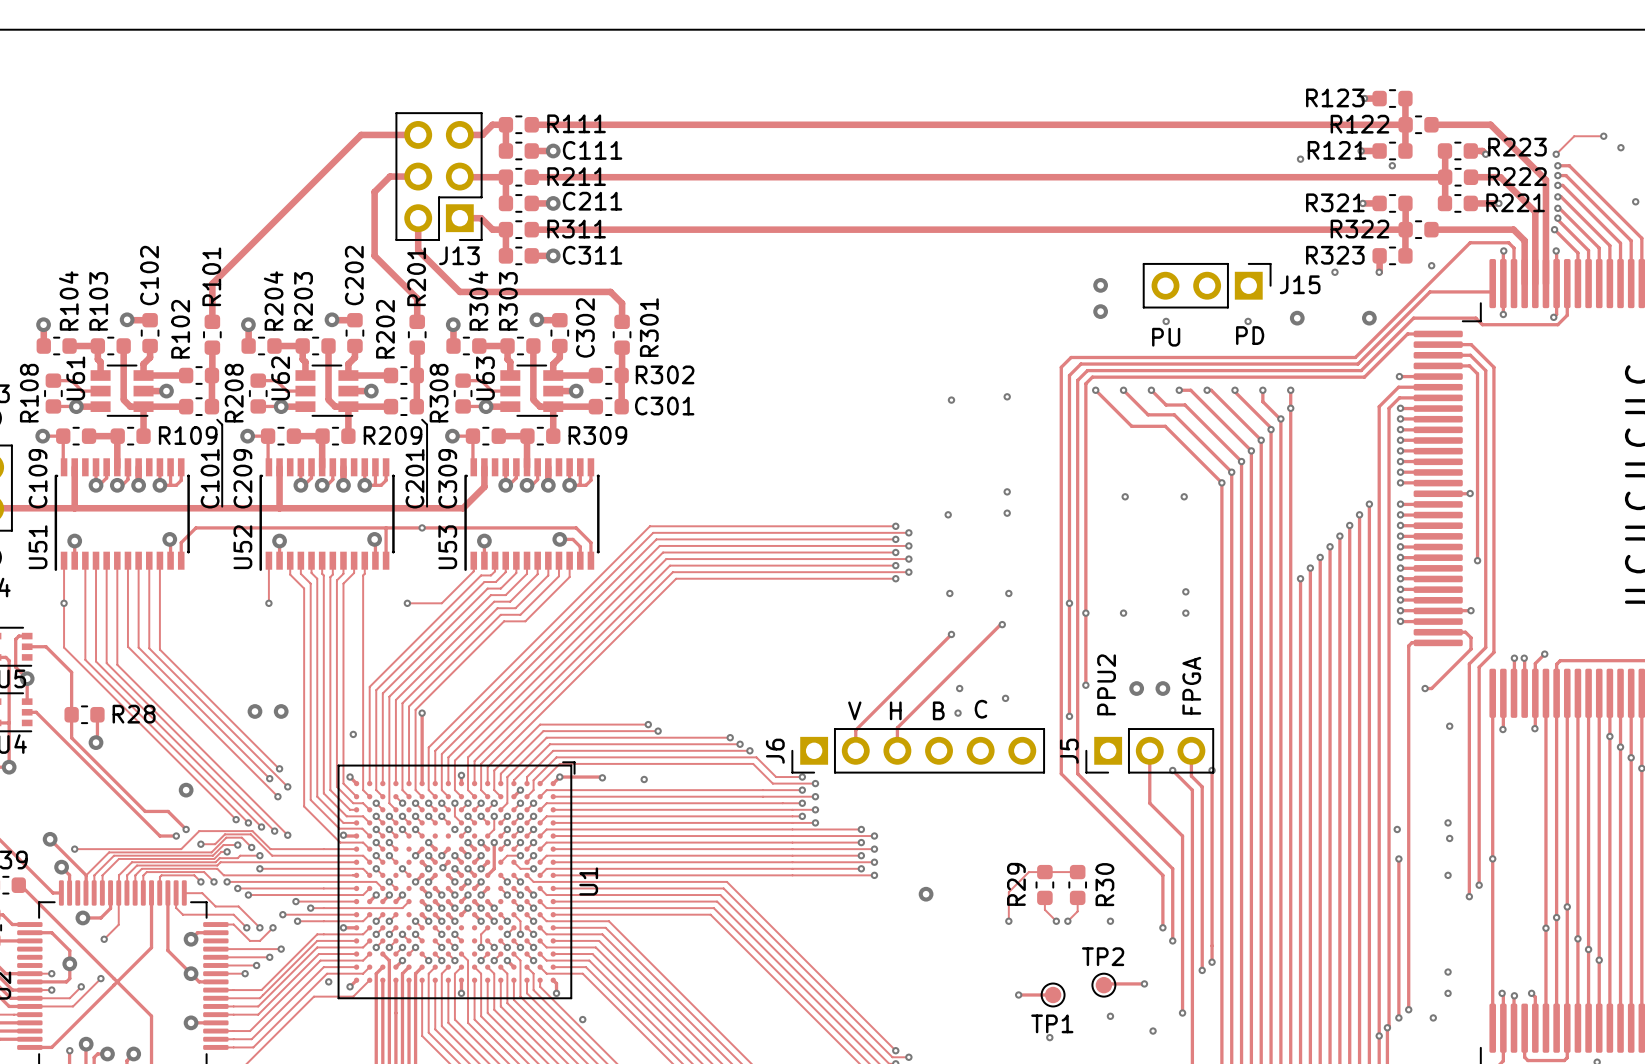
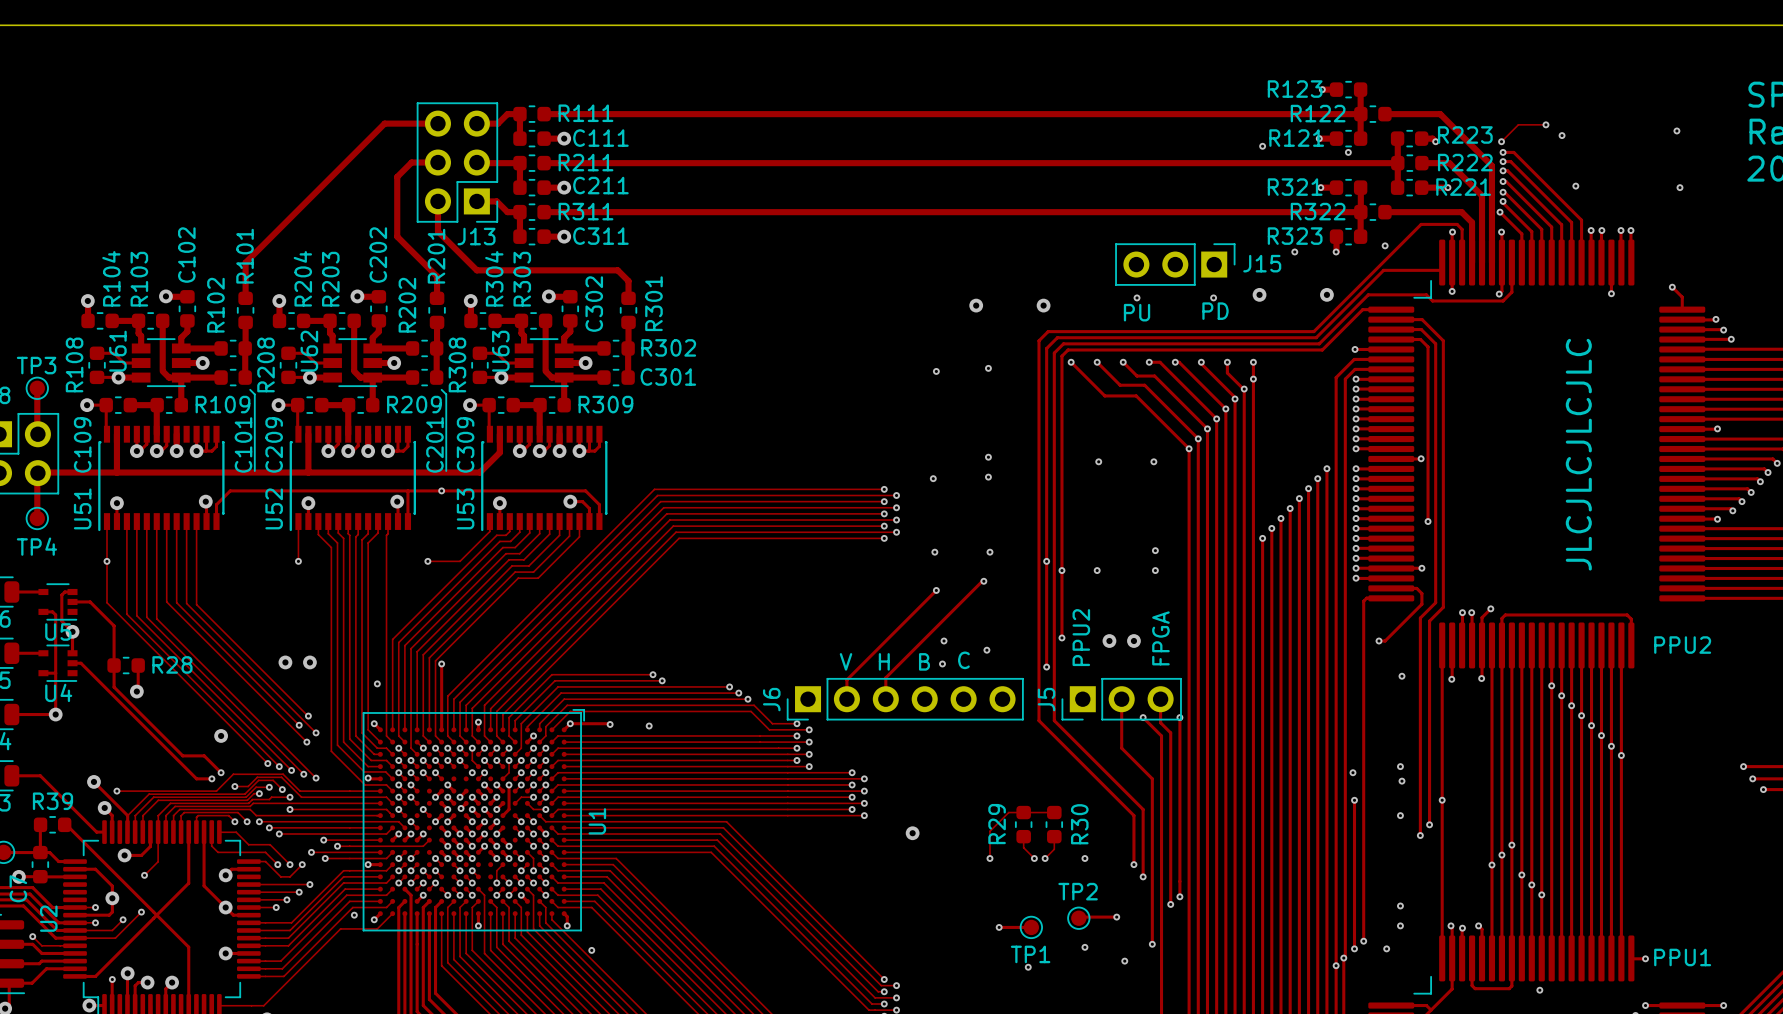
via: (1100, 285) -> none
via: (1100, 311) -> none
via: none -> (976, 305)
via: none -> (1043, 305)

